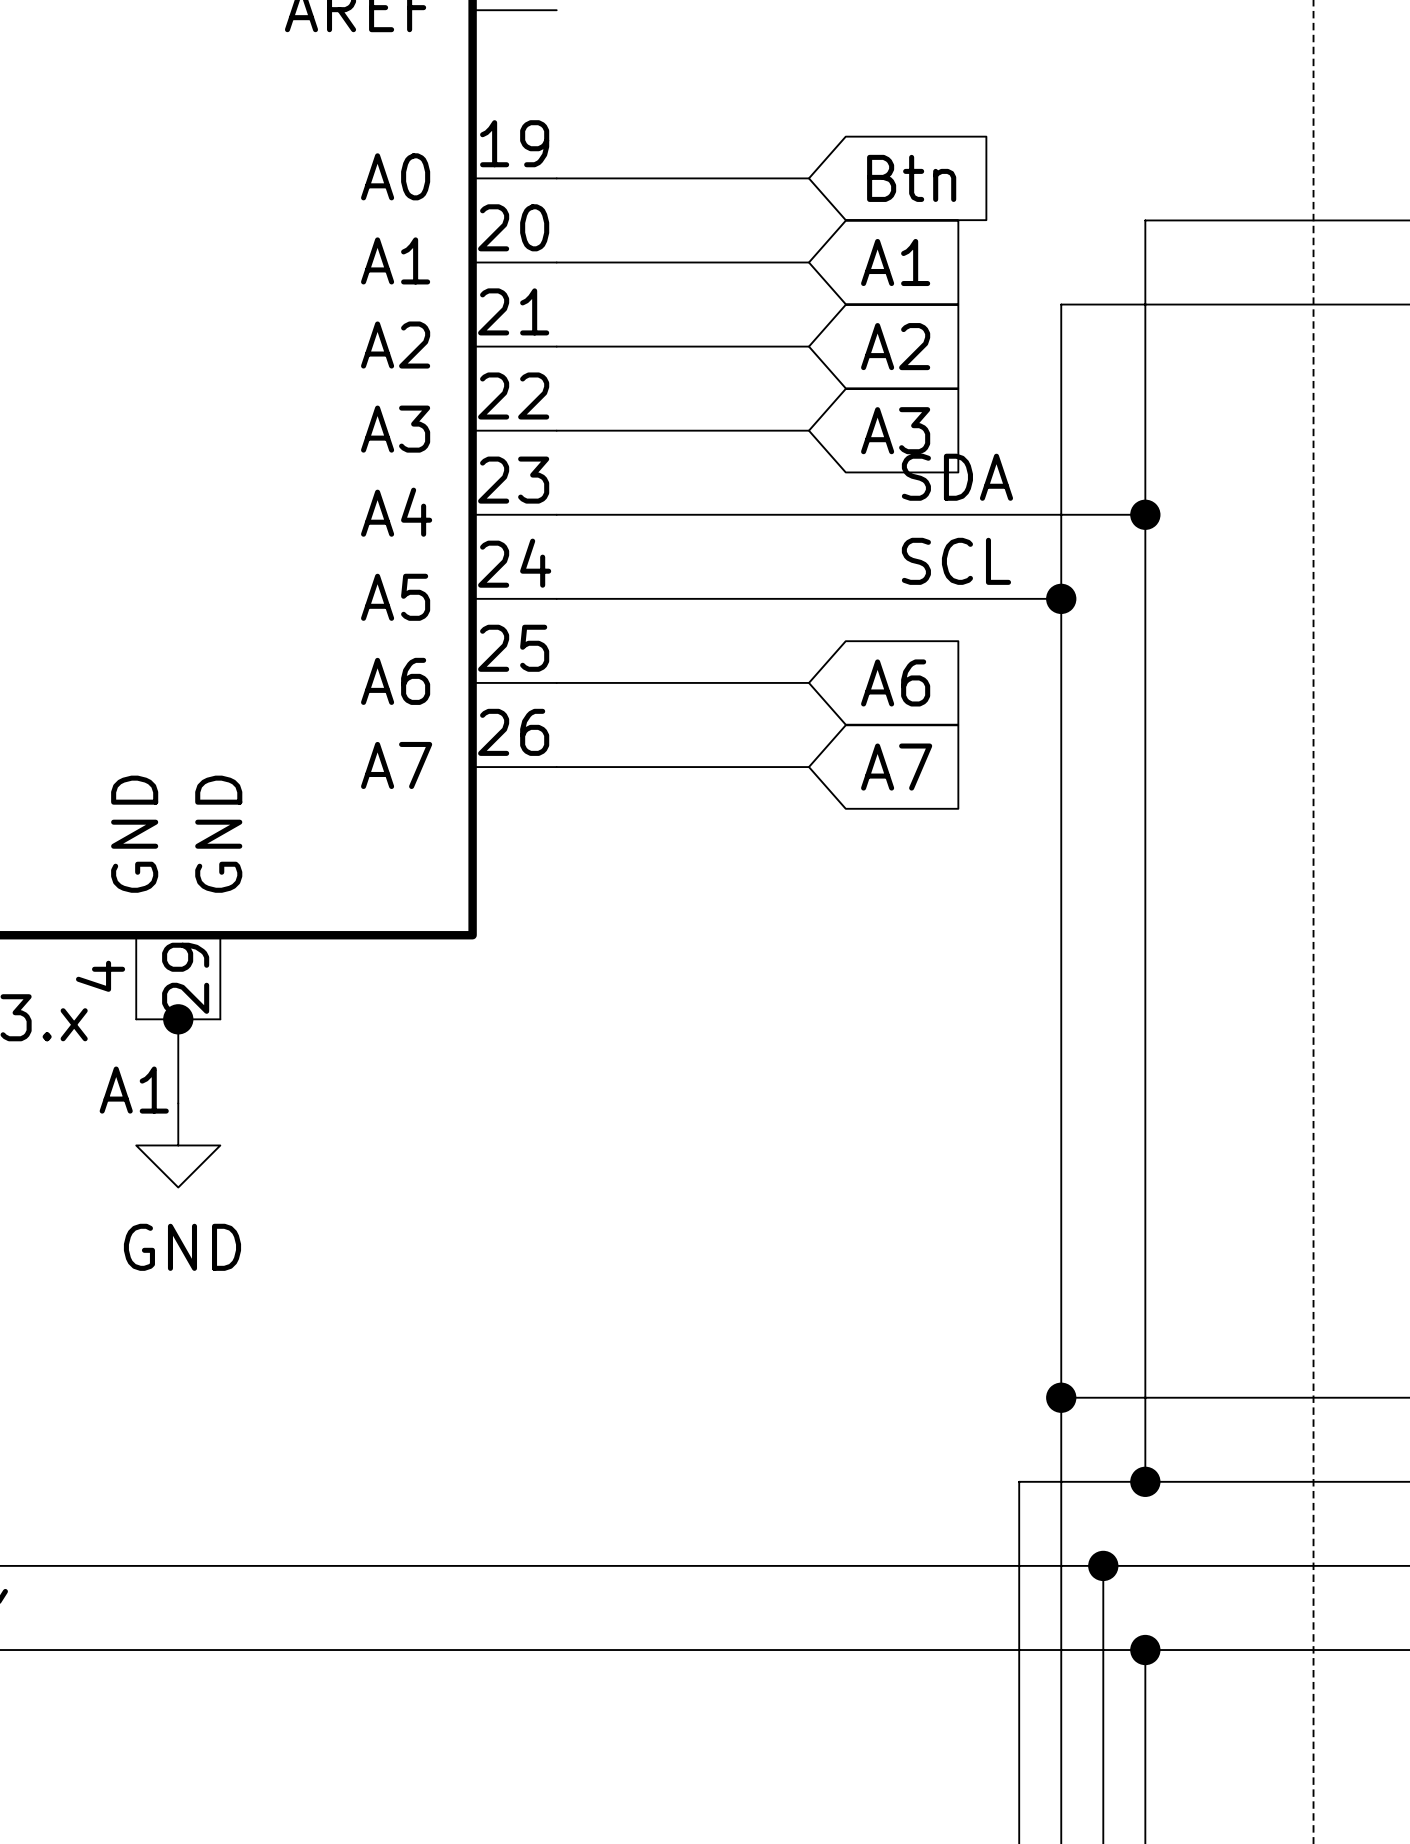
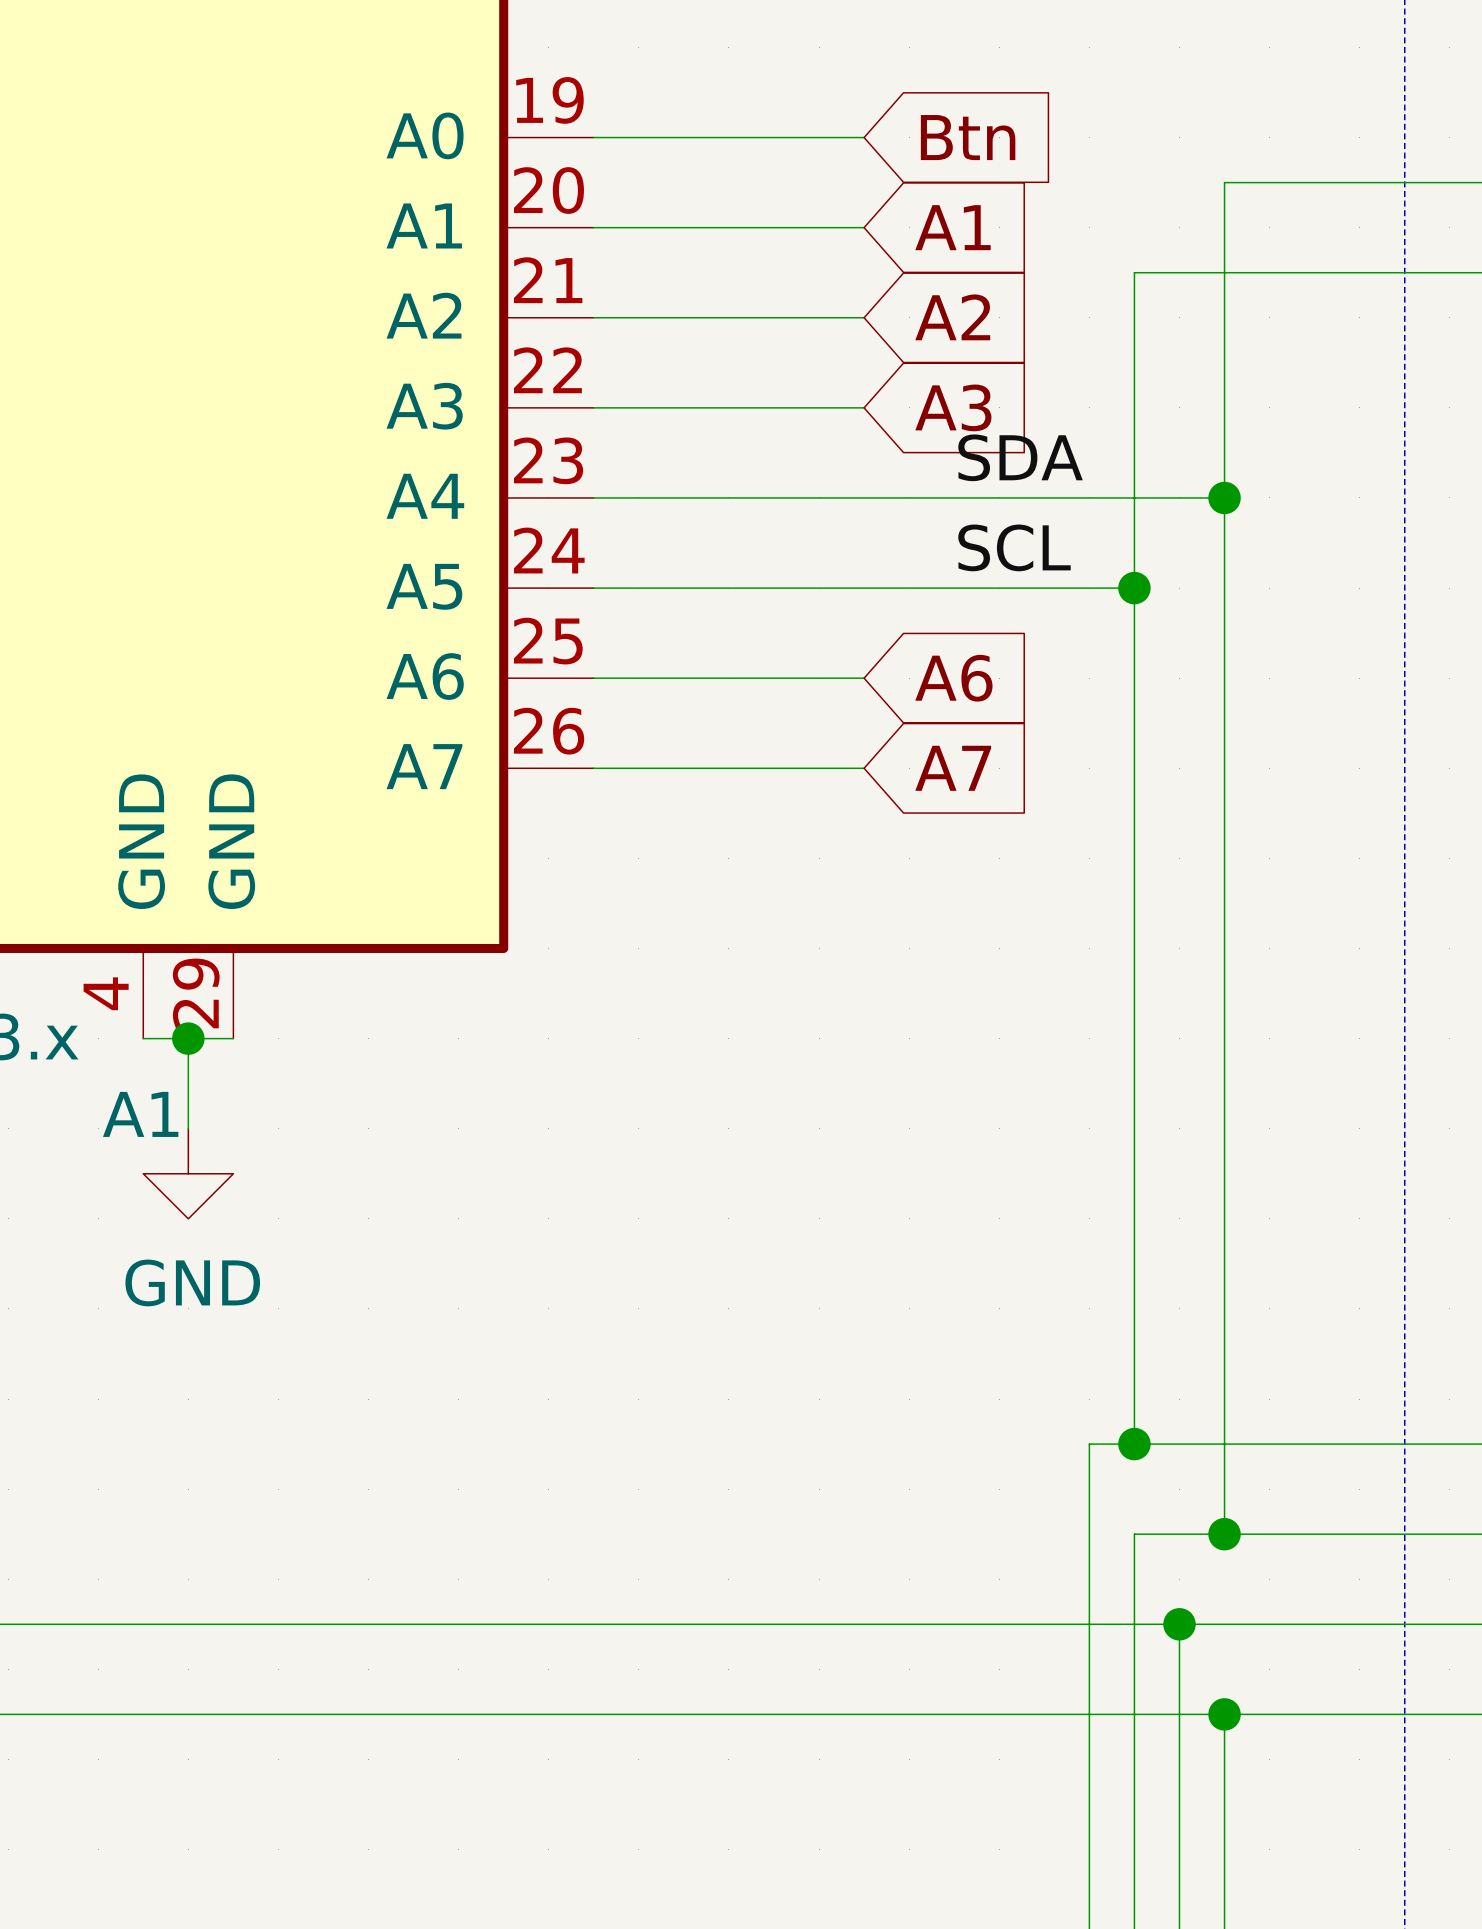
wire: (1061, 1397) (1061, 1481) (1019, 1481) -> (1134, 1444) (1089, 1444) (1089, 1534)

